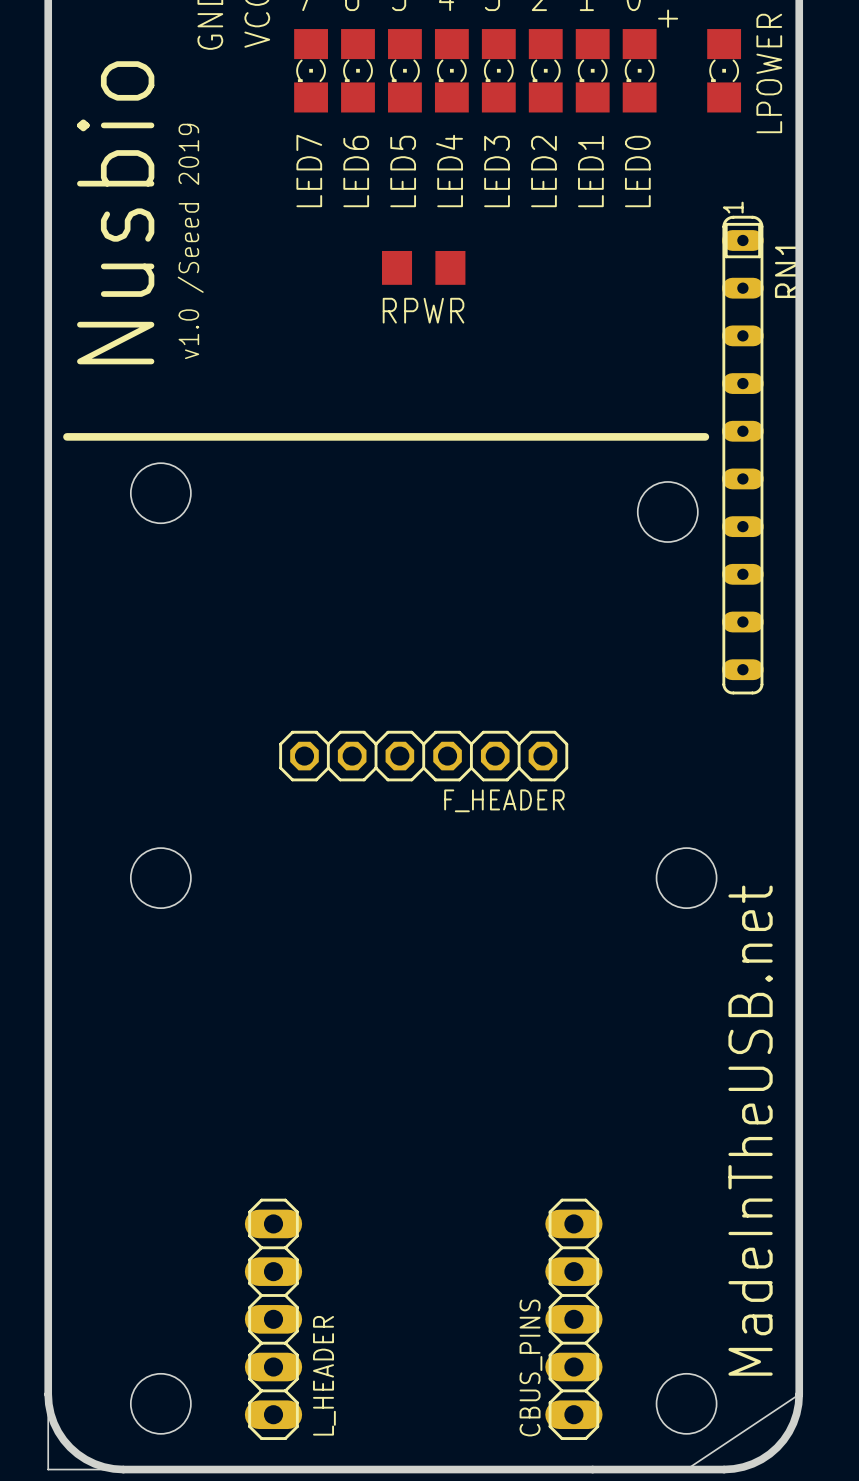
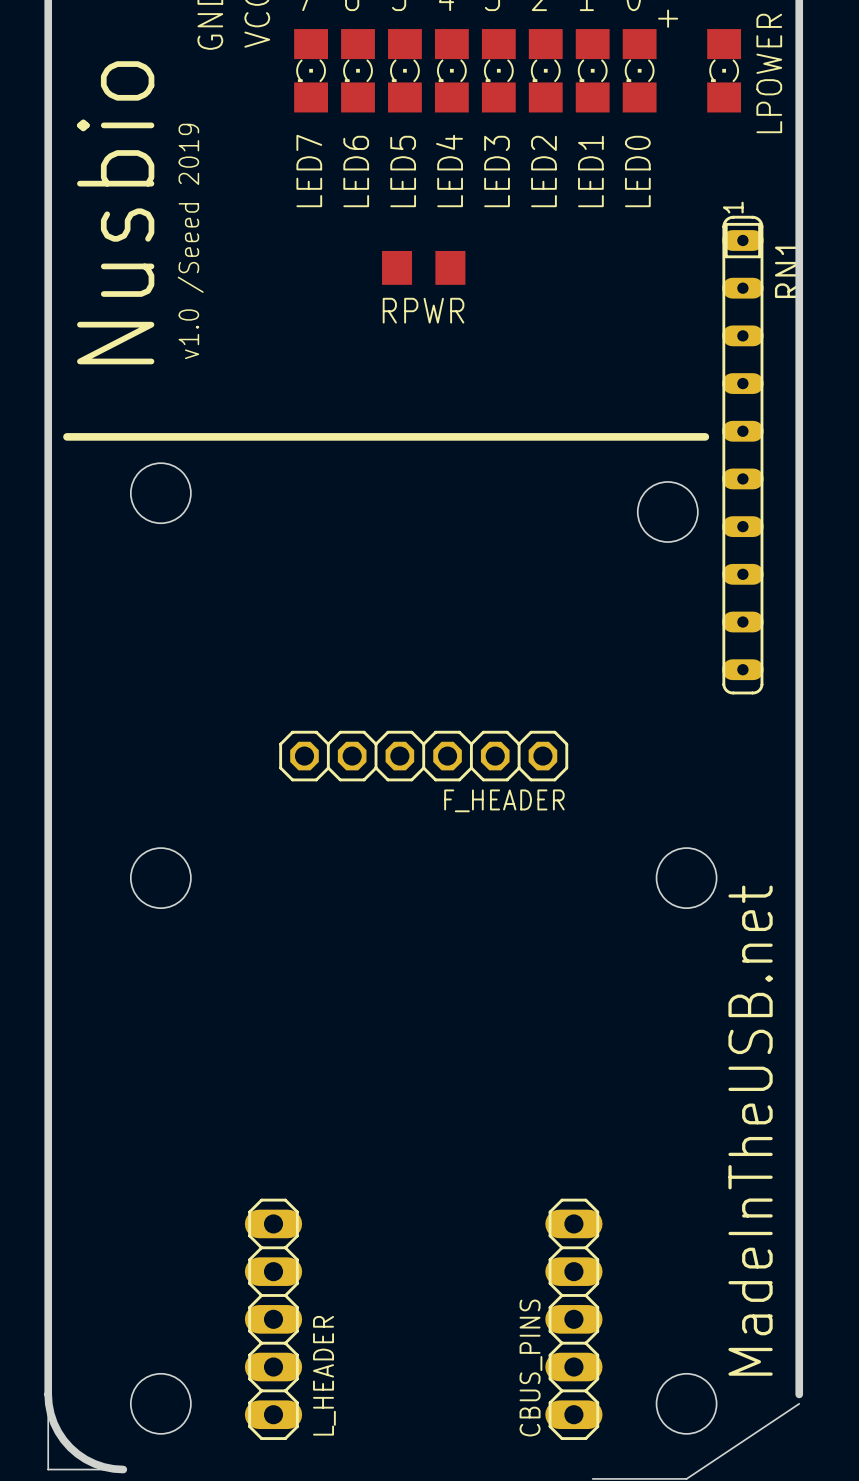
board edge: none -> (799, 1403) (686, 1478) (592, 1478)
board edge: (123, 1469) (724, 1469) (733, 1468) (761, 1459) (777, 1447) (793, 1423) (799, 1394) (686, 1469) (592, 1469) -> none

